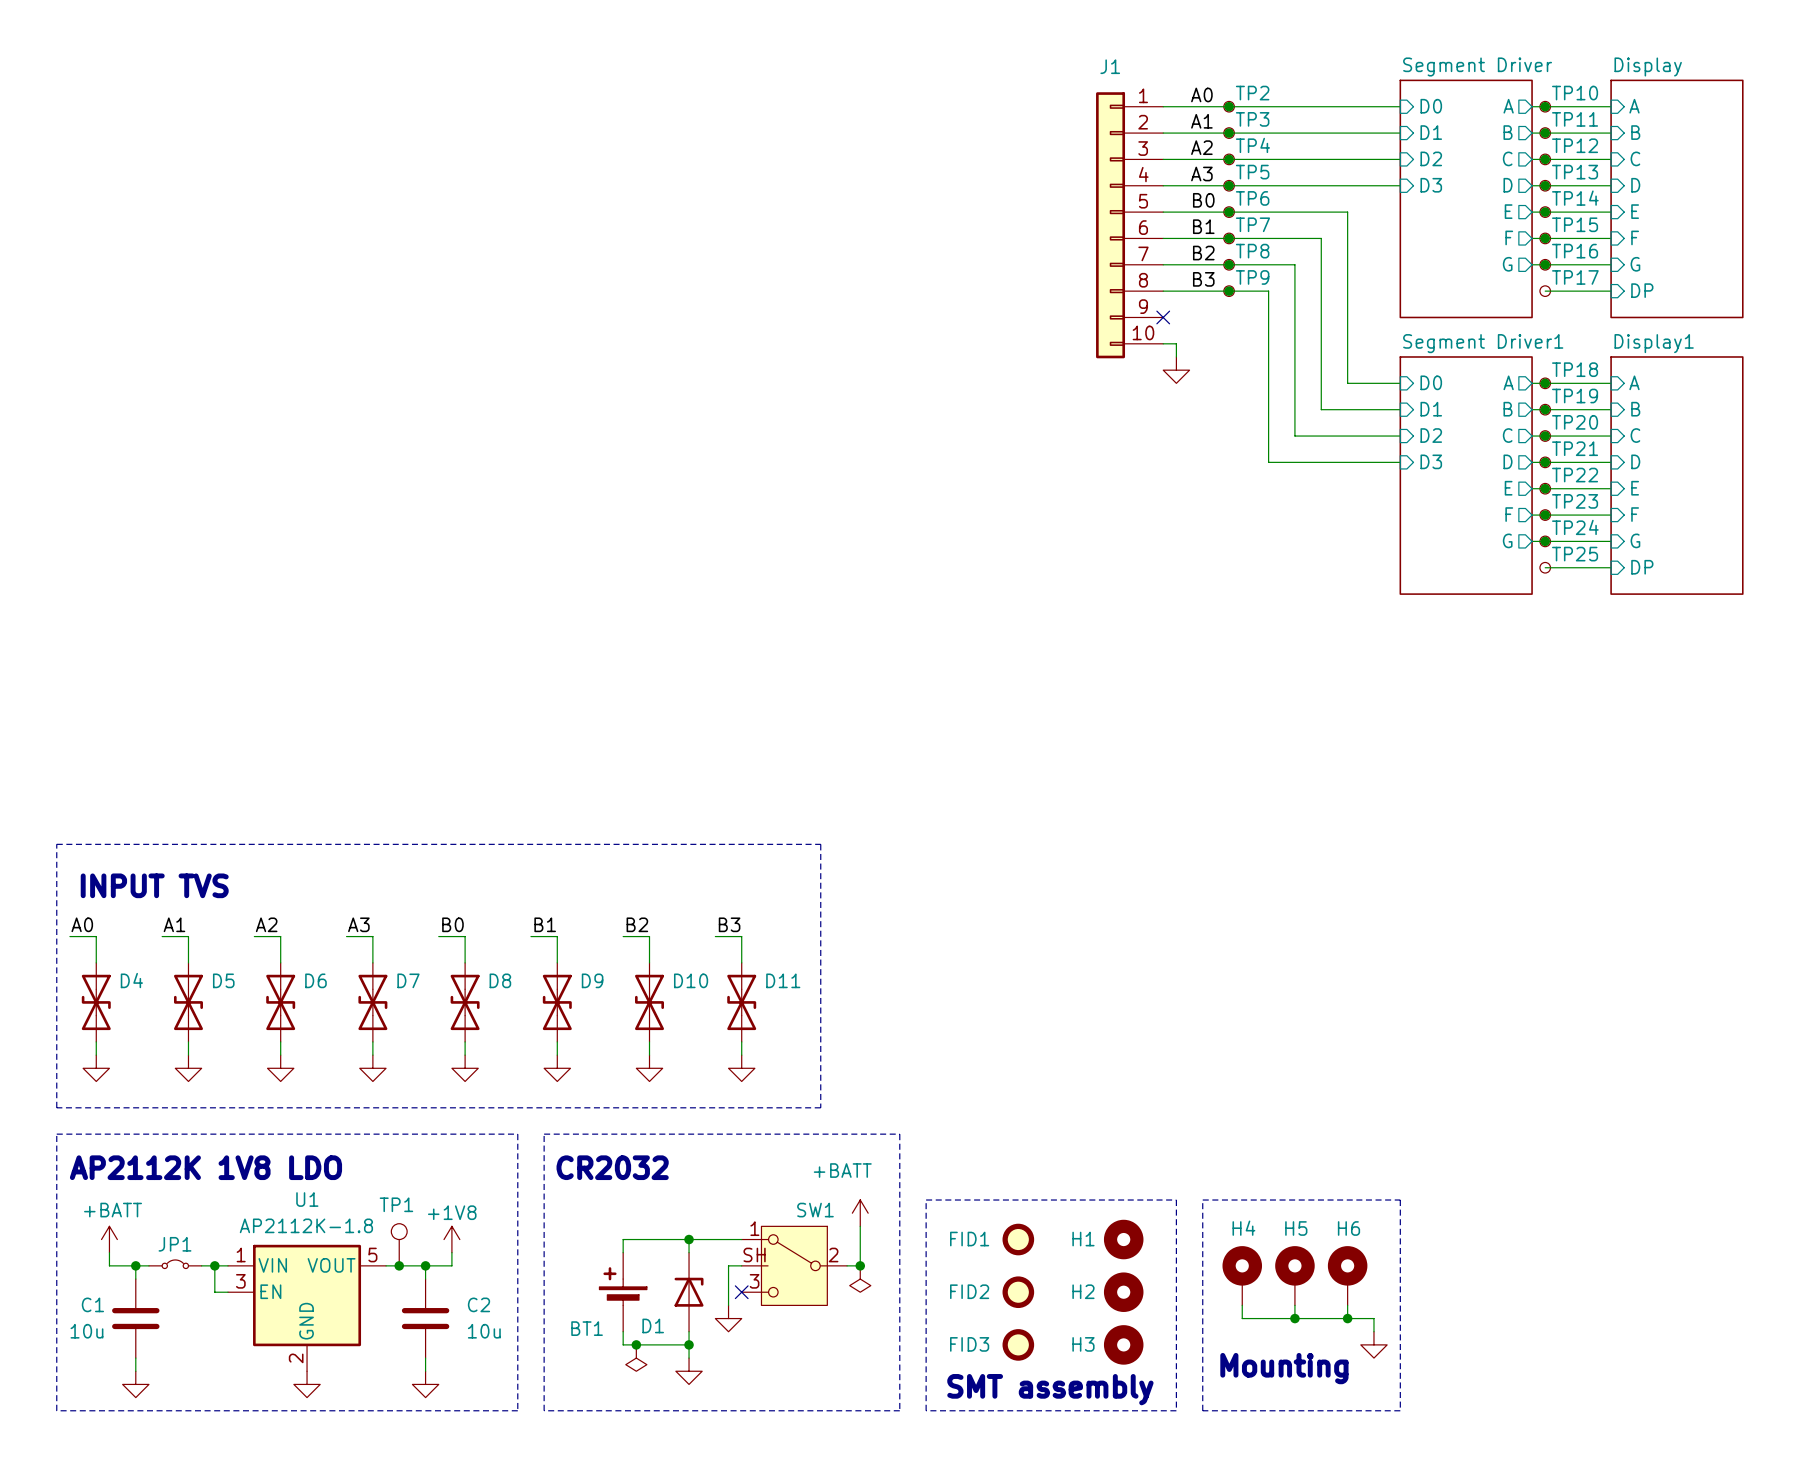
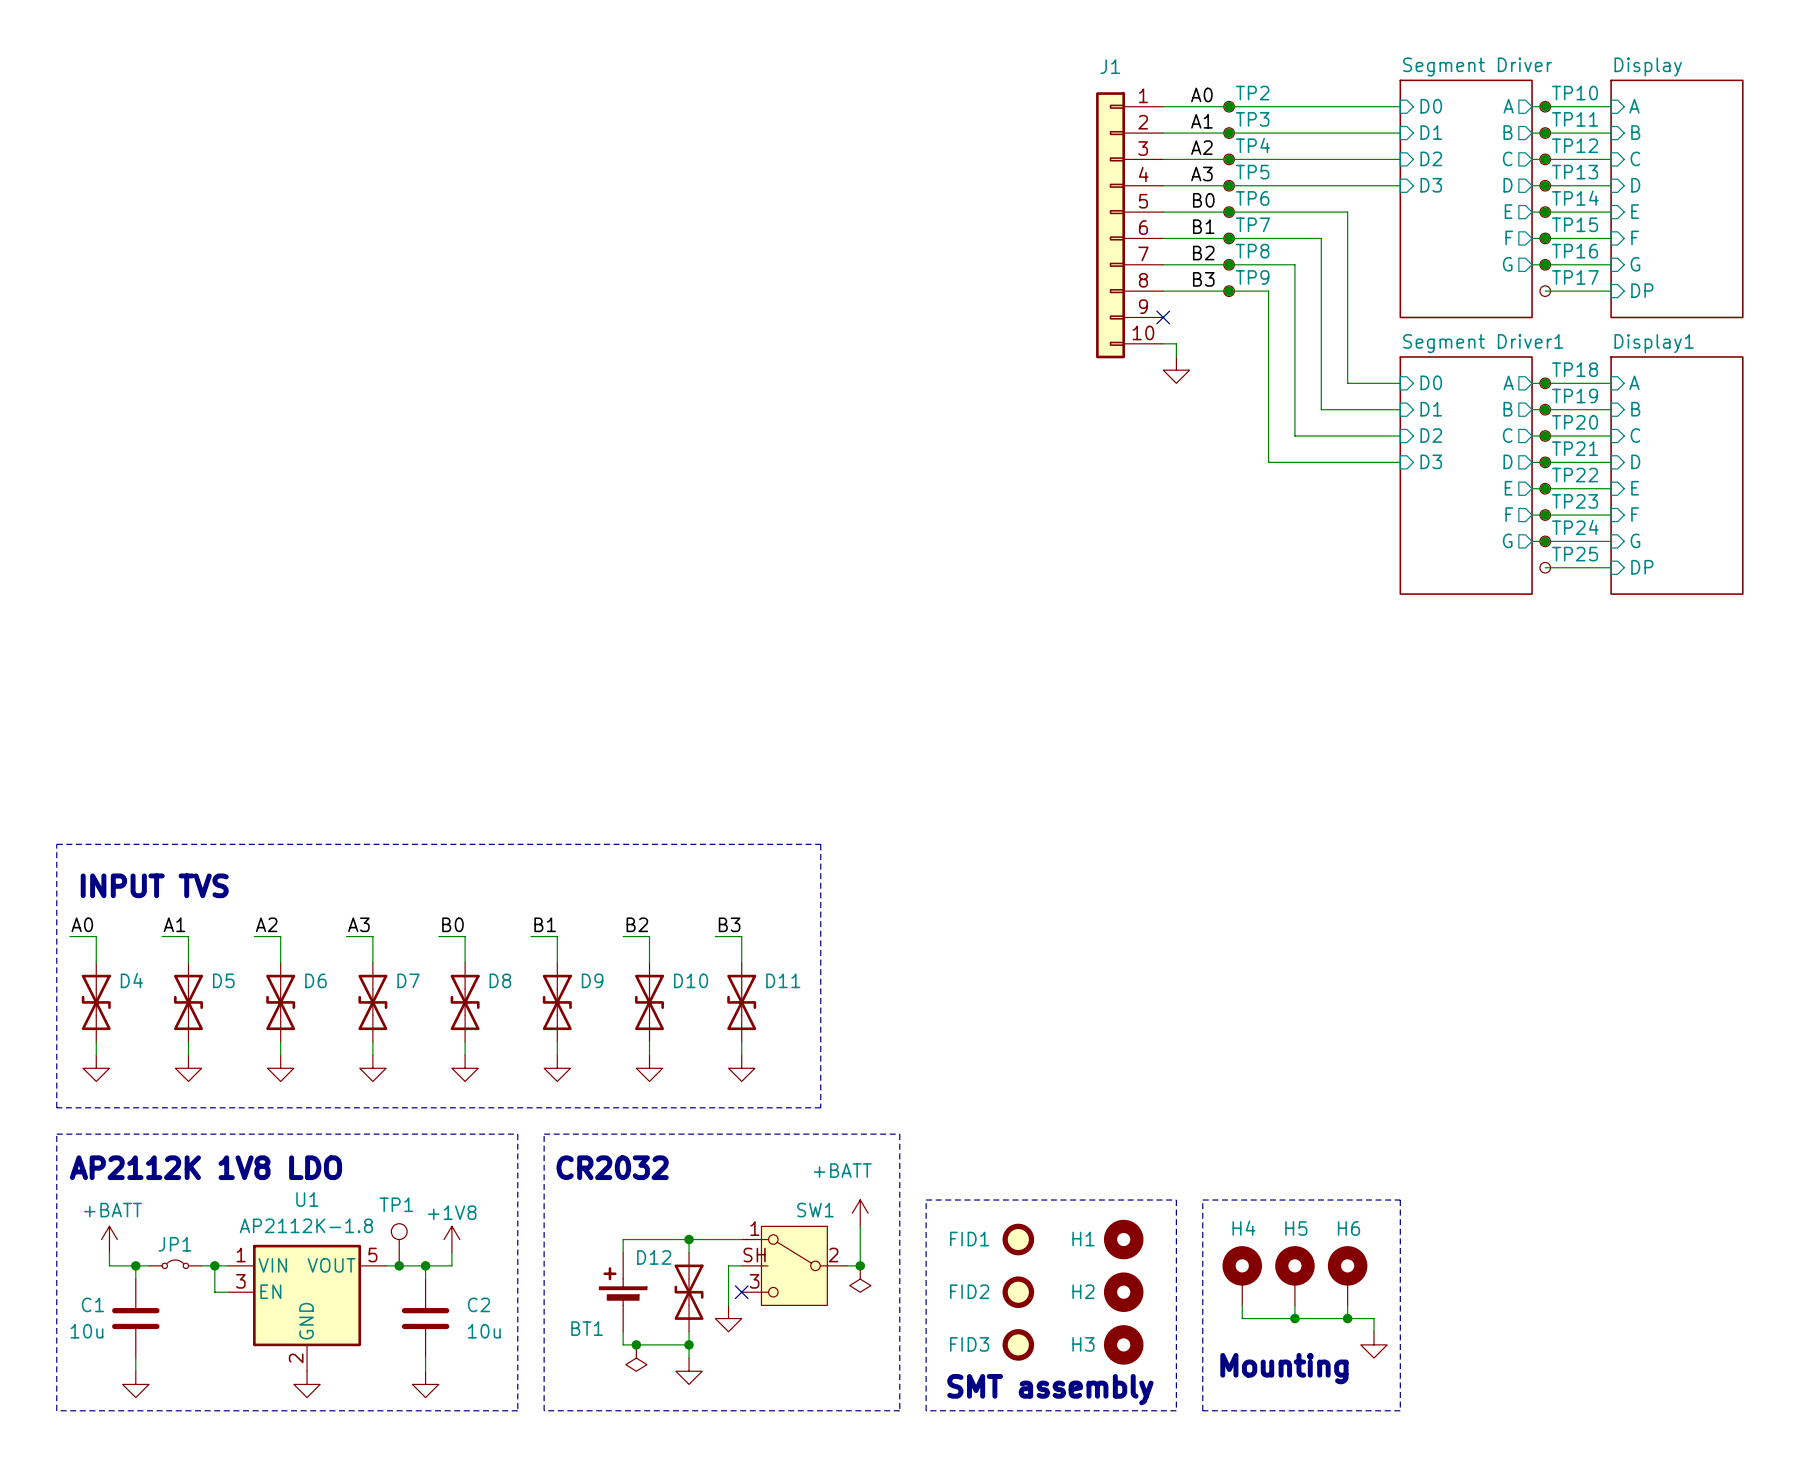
D1: (689, 1292) -> none
D12: none -> (689, 1292)

